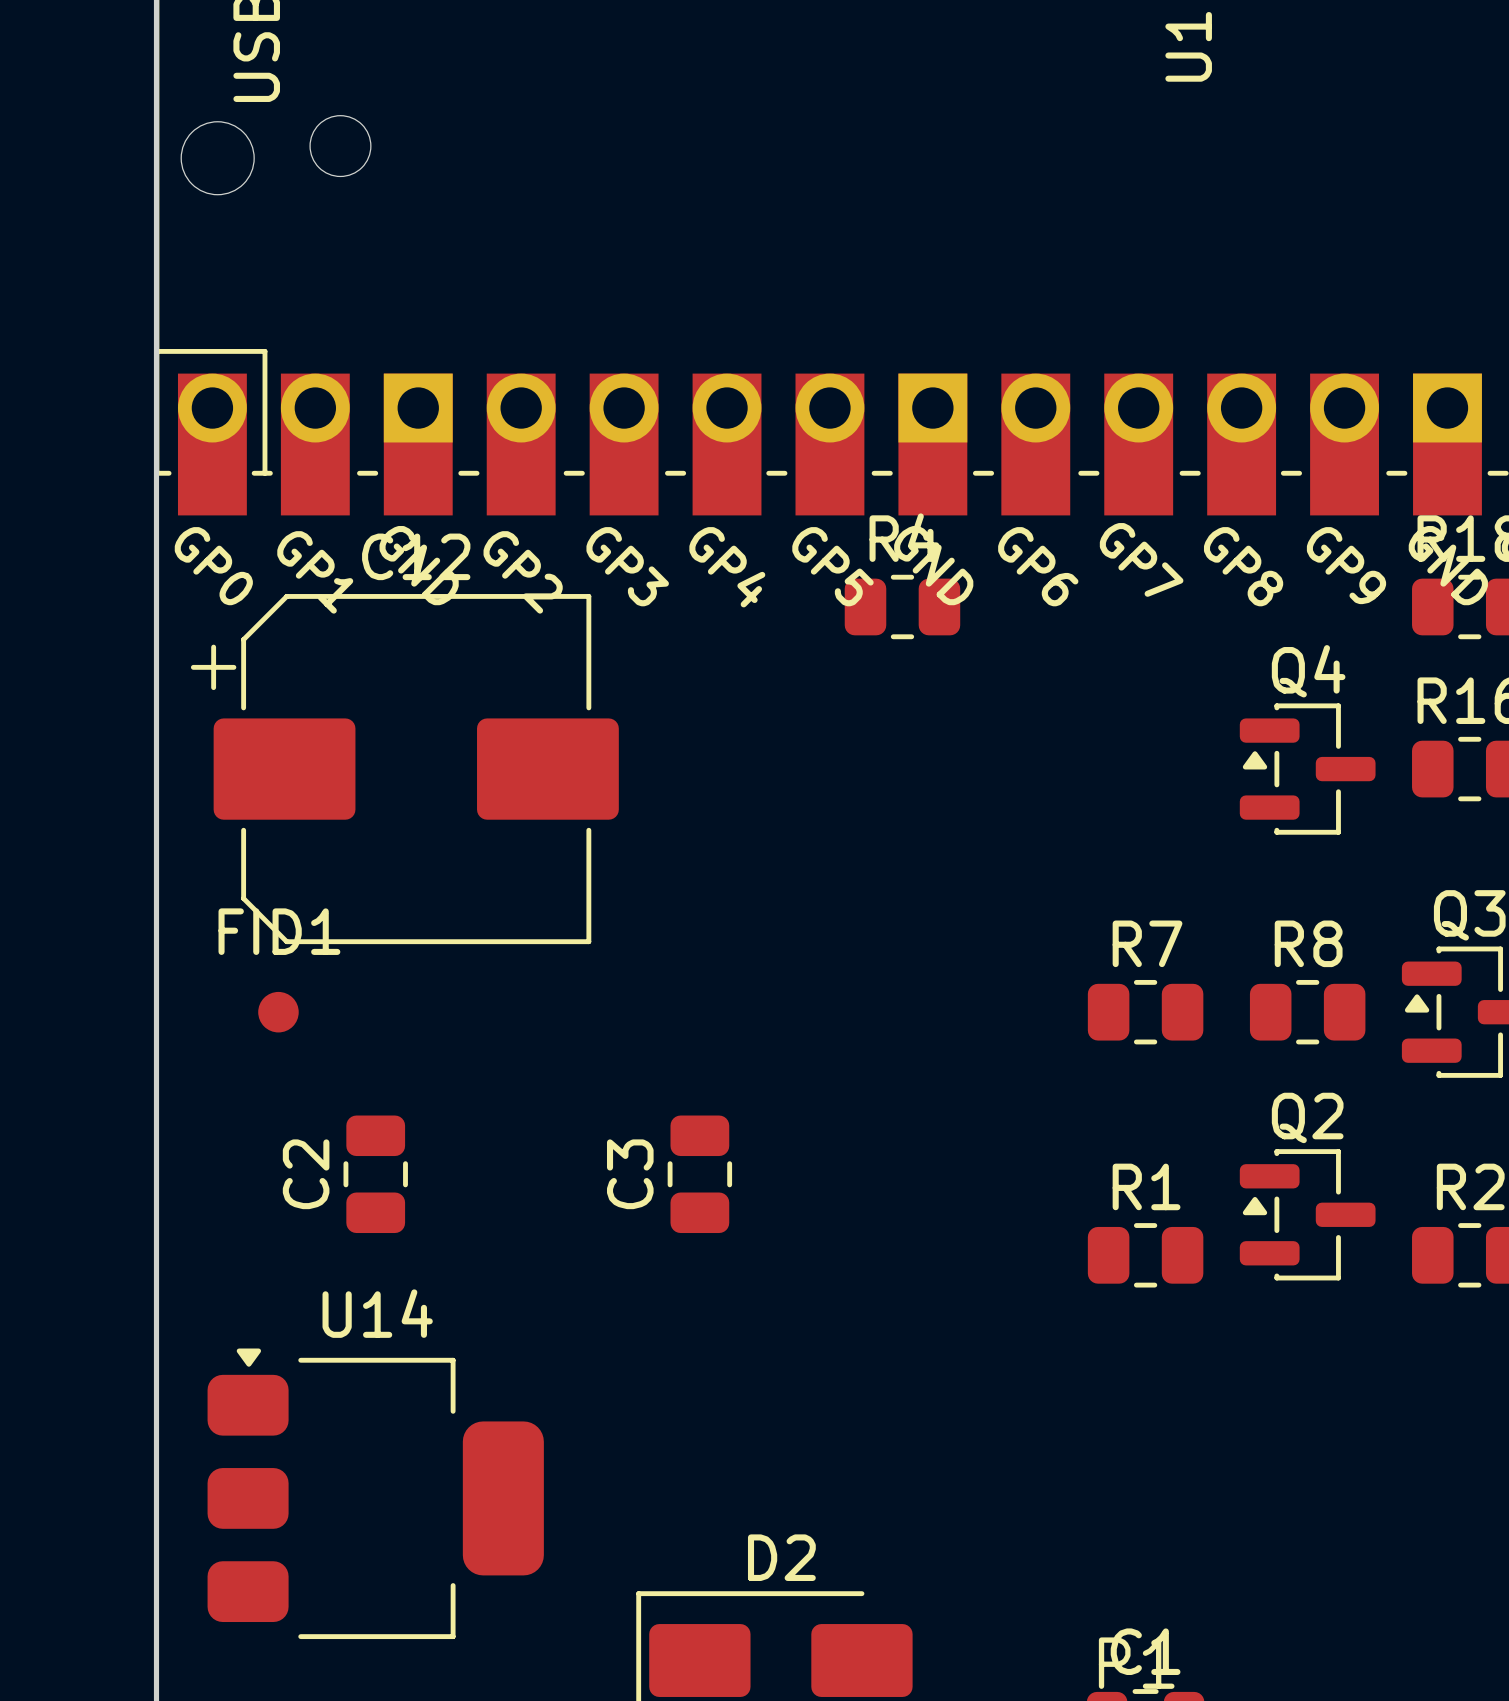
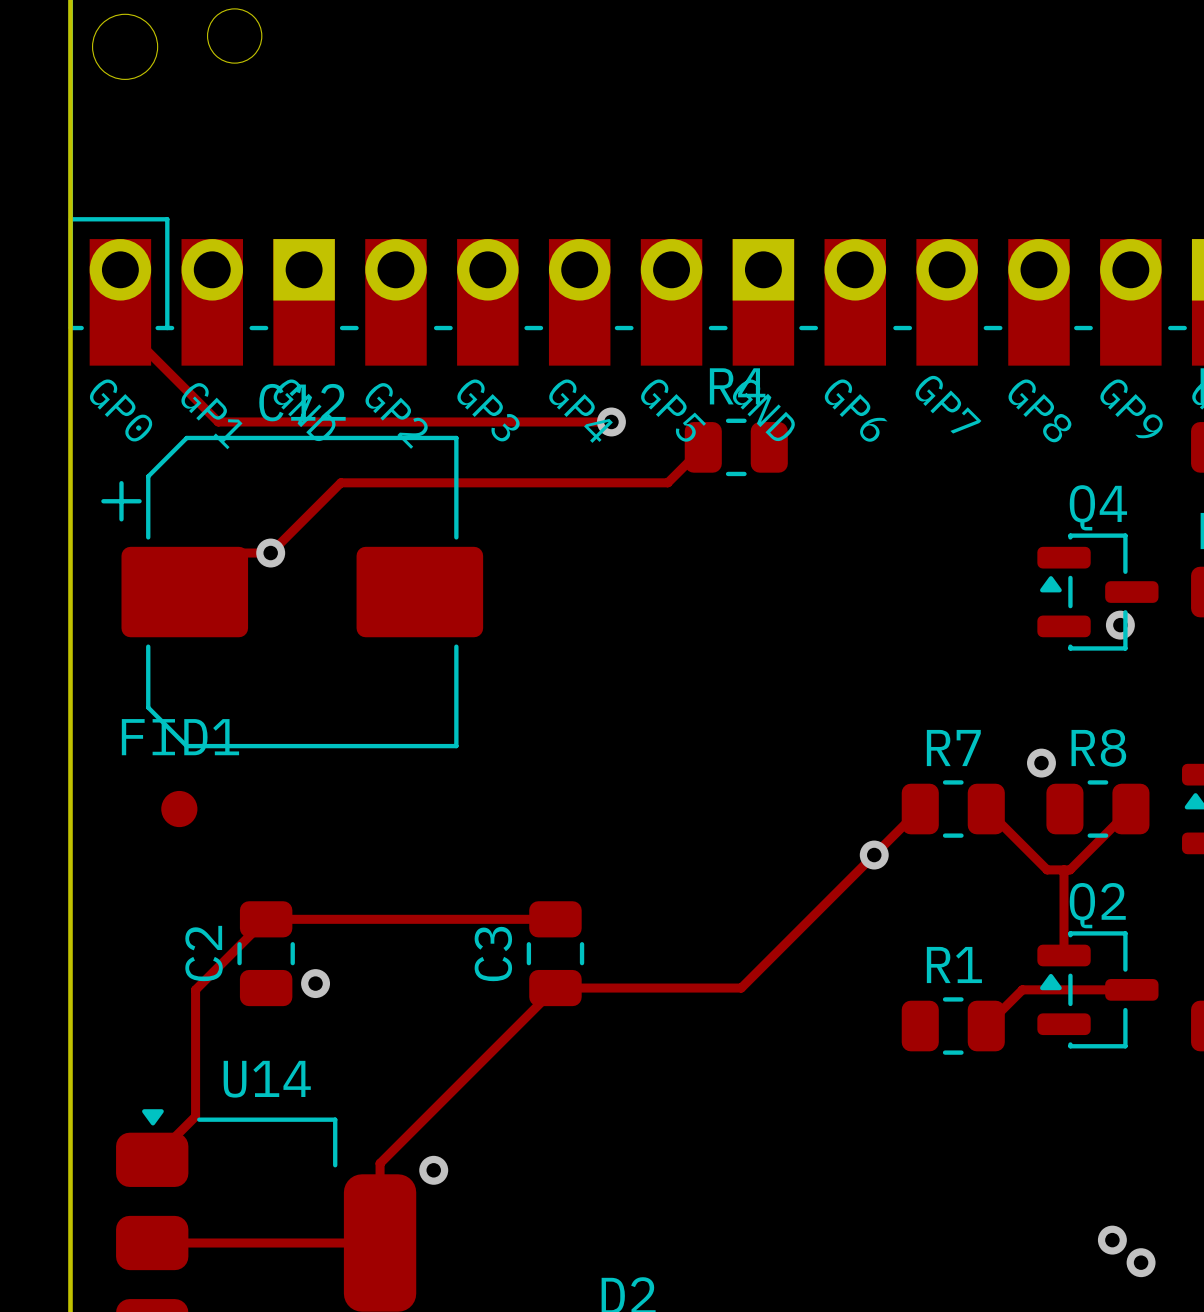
track: none -> (120, 269) (120, 324) (218, 421) (611, 421)
via: none -> (611, 421)
track: none -> (703, 447) (667, 482) (340, 482) (270, 553) (223, 553) (184, 592)
via: none -> (270, 553)
via: none -> (1120, 625)
via: none -> (1041, 763)
track: none -> (920, 809) (741, 988) (555, 988) (380, 1163) (380, 1243) (152, 1243)
track: none -> (986, 809) (1047, 869) (1070, 869) (1130, 809)
via: none -> (874, 855)
track: none -> (1064, 869) (1064, 955)
track: none -> (555, 919) (266, 919) (195, 989) (195, 1116) (152, 1159)
via: none -> (315, 983)
track: none -> (1131, 989) (1022, 989) (986, 1026)
via: none -> (433, 1170)
via: none -> (1112, 1240)
via: none -> (1141, 1262)

